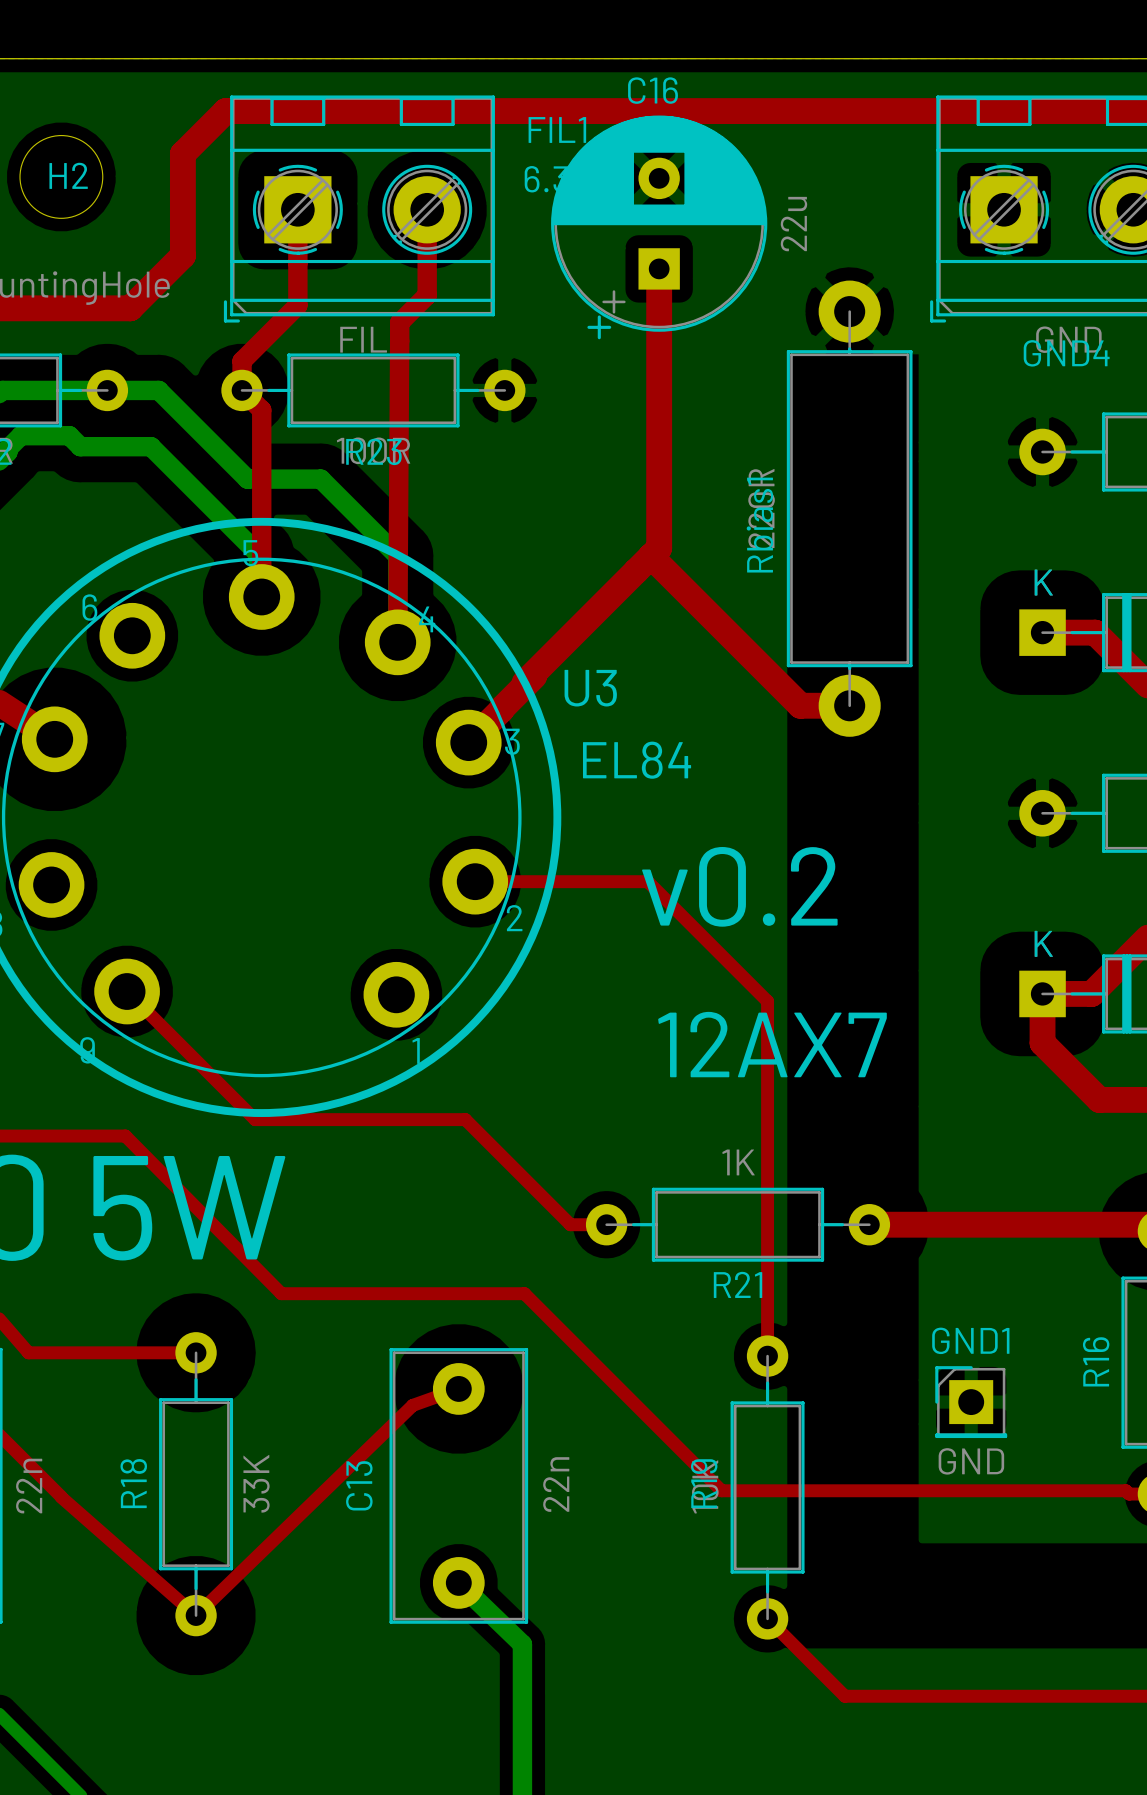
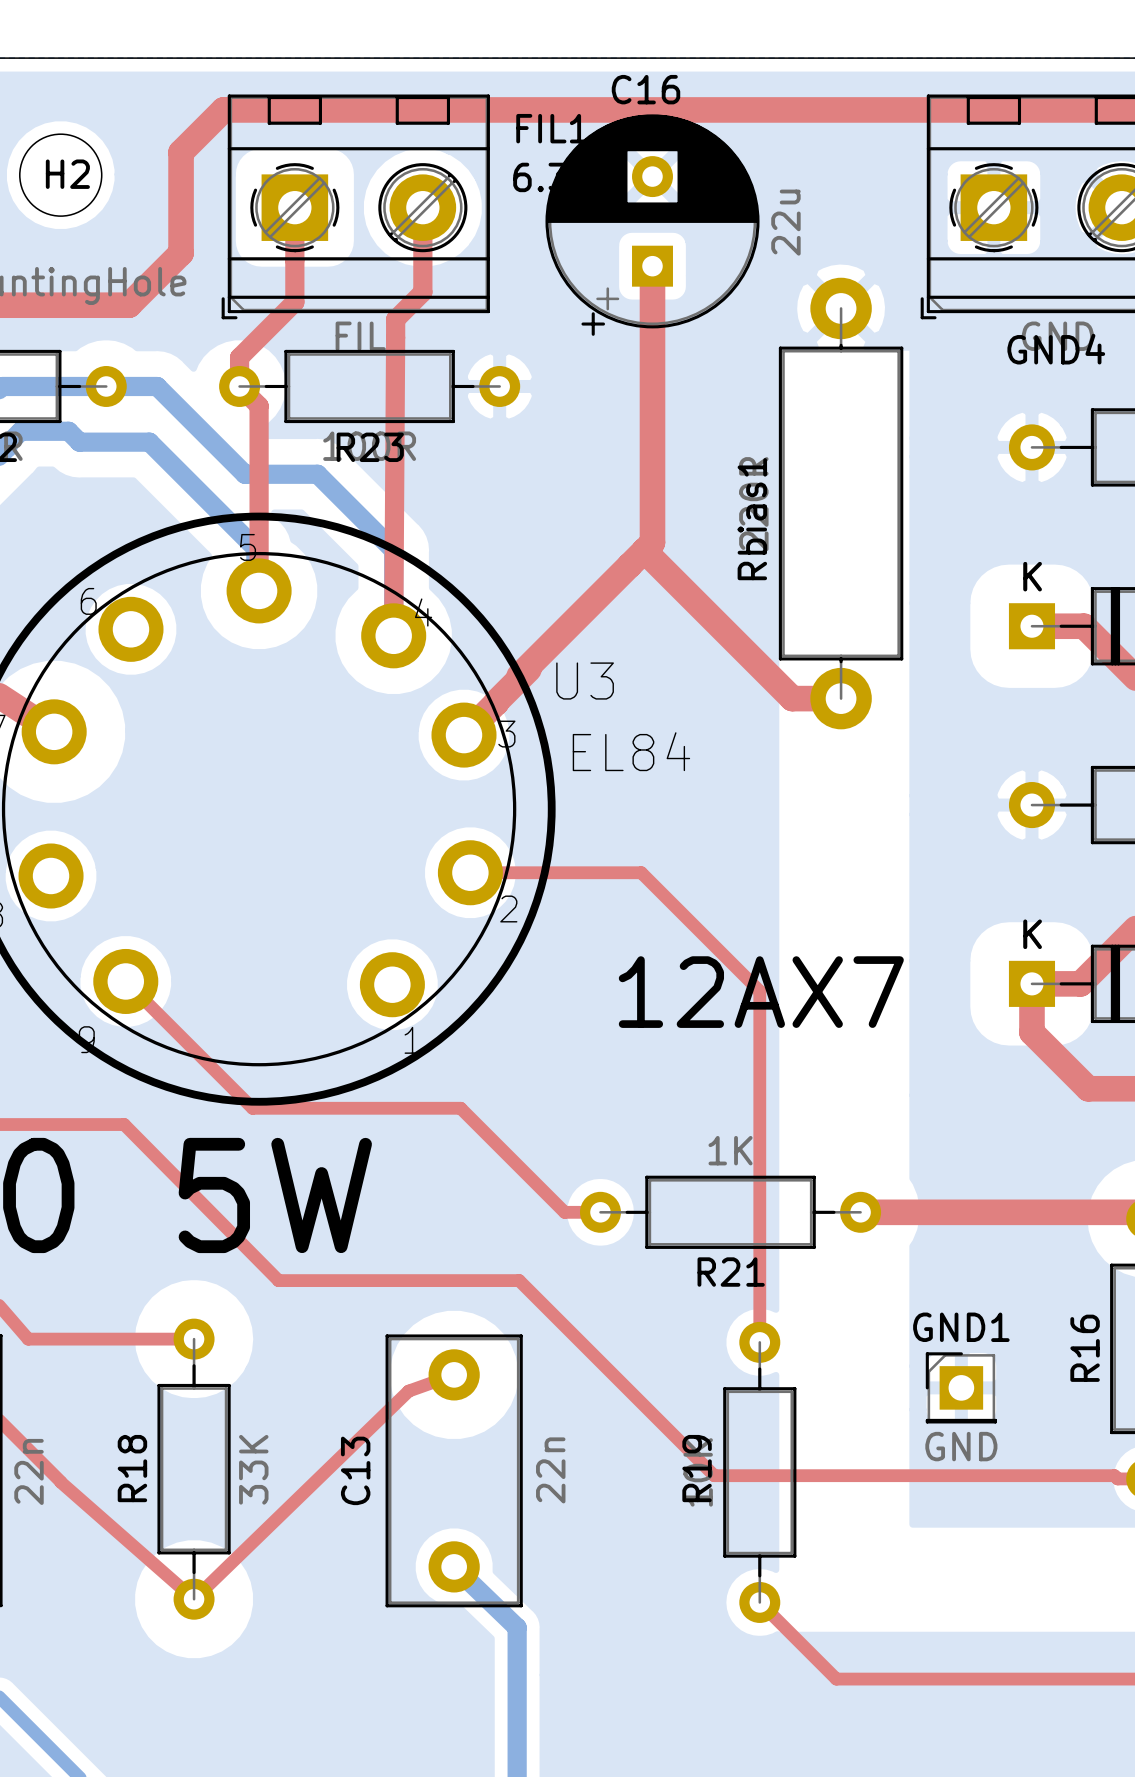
text: v0.2 (739, 886) -> none
text position: 12AX7 (772, 1044) -> 12AX7 (761, 992)

